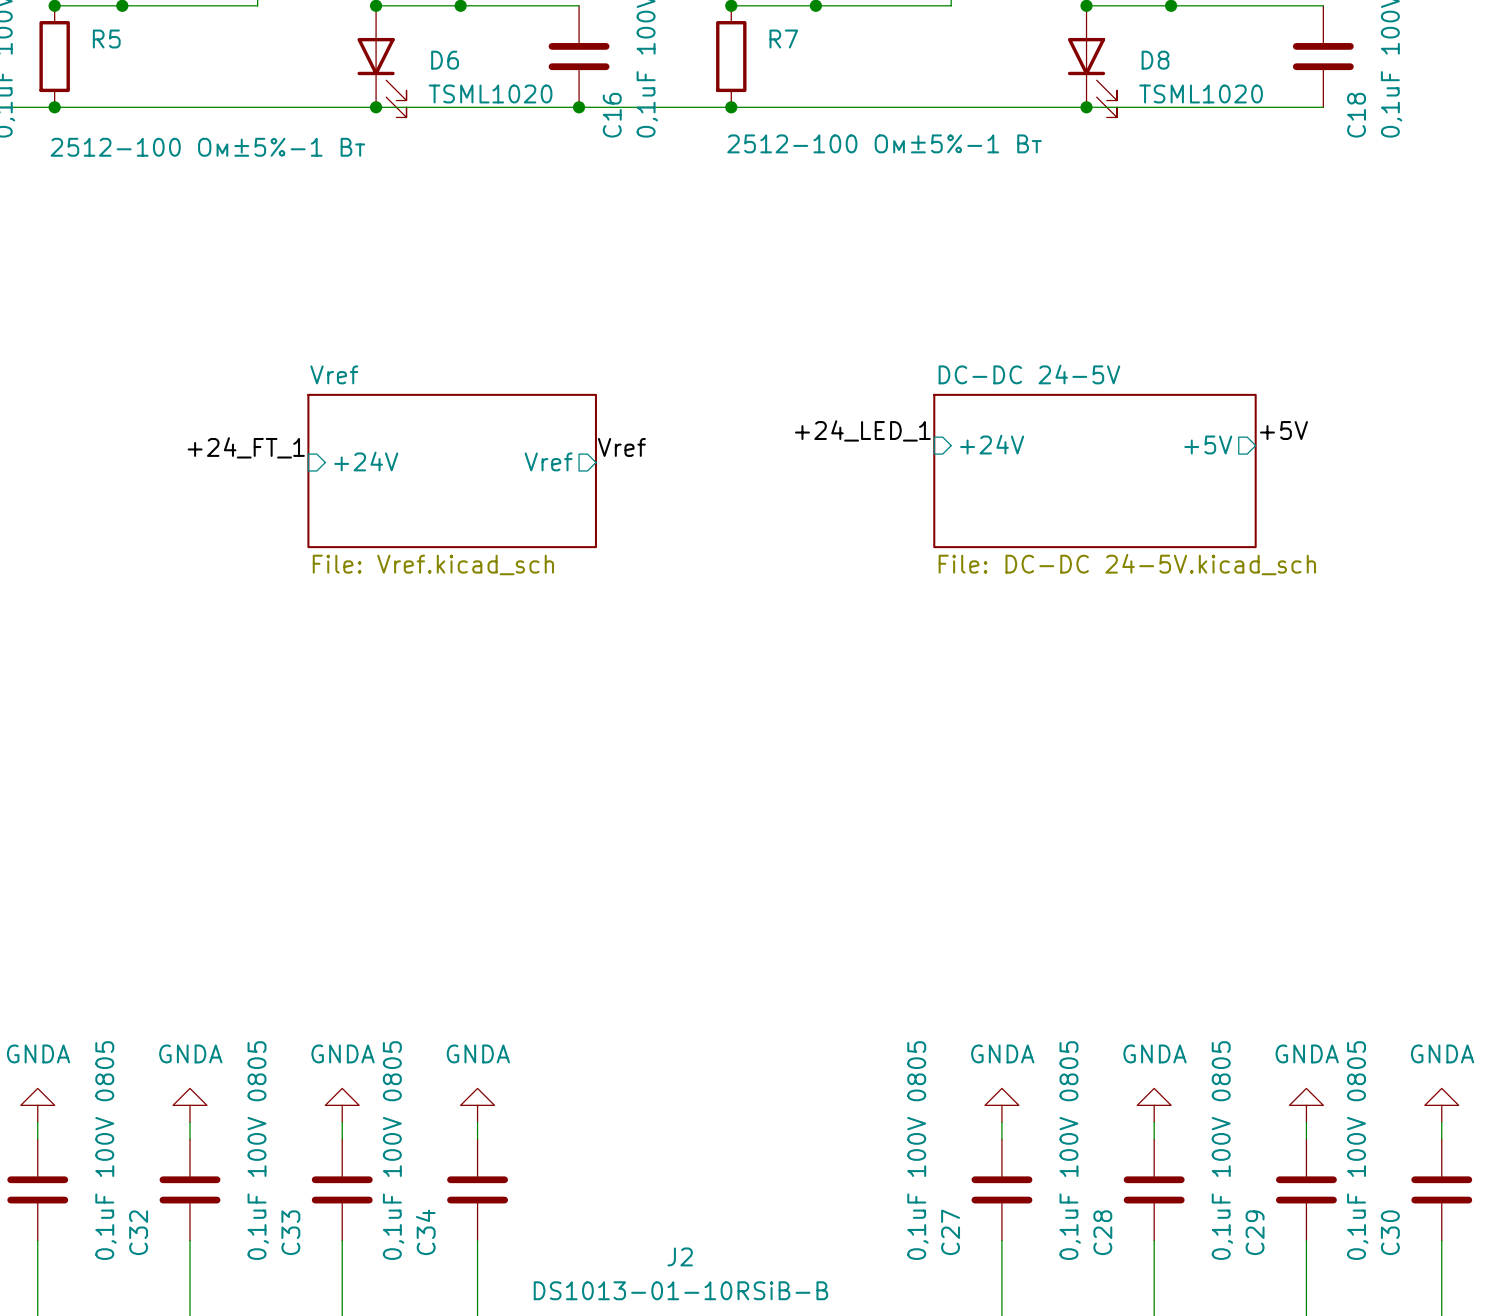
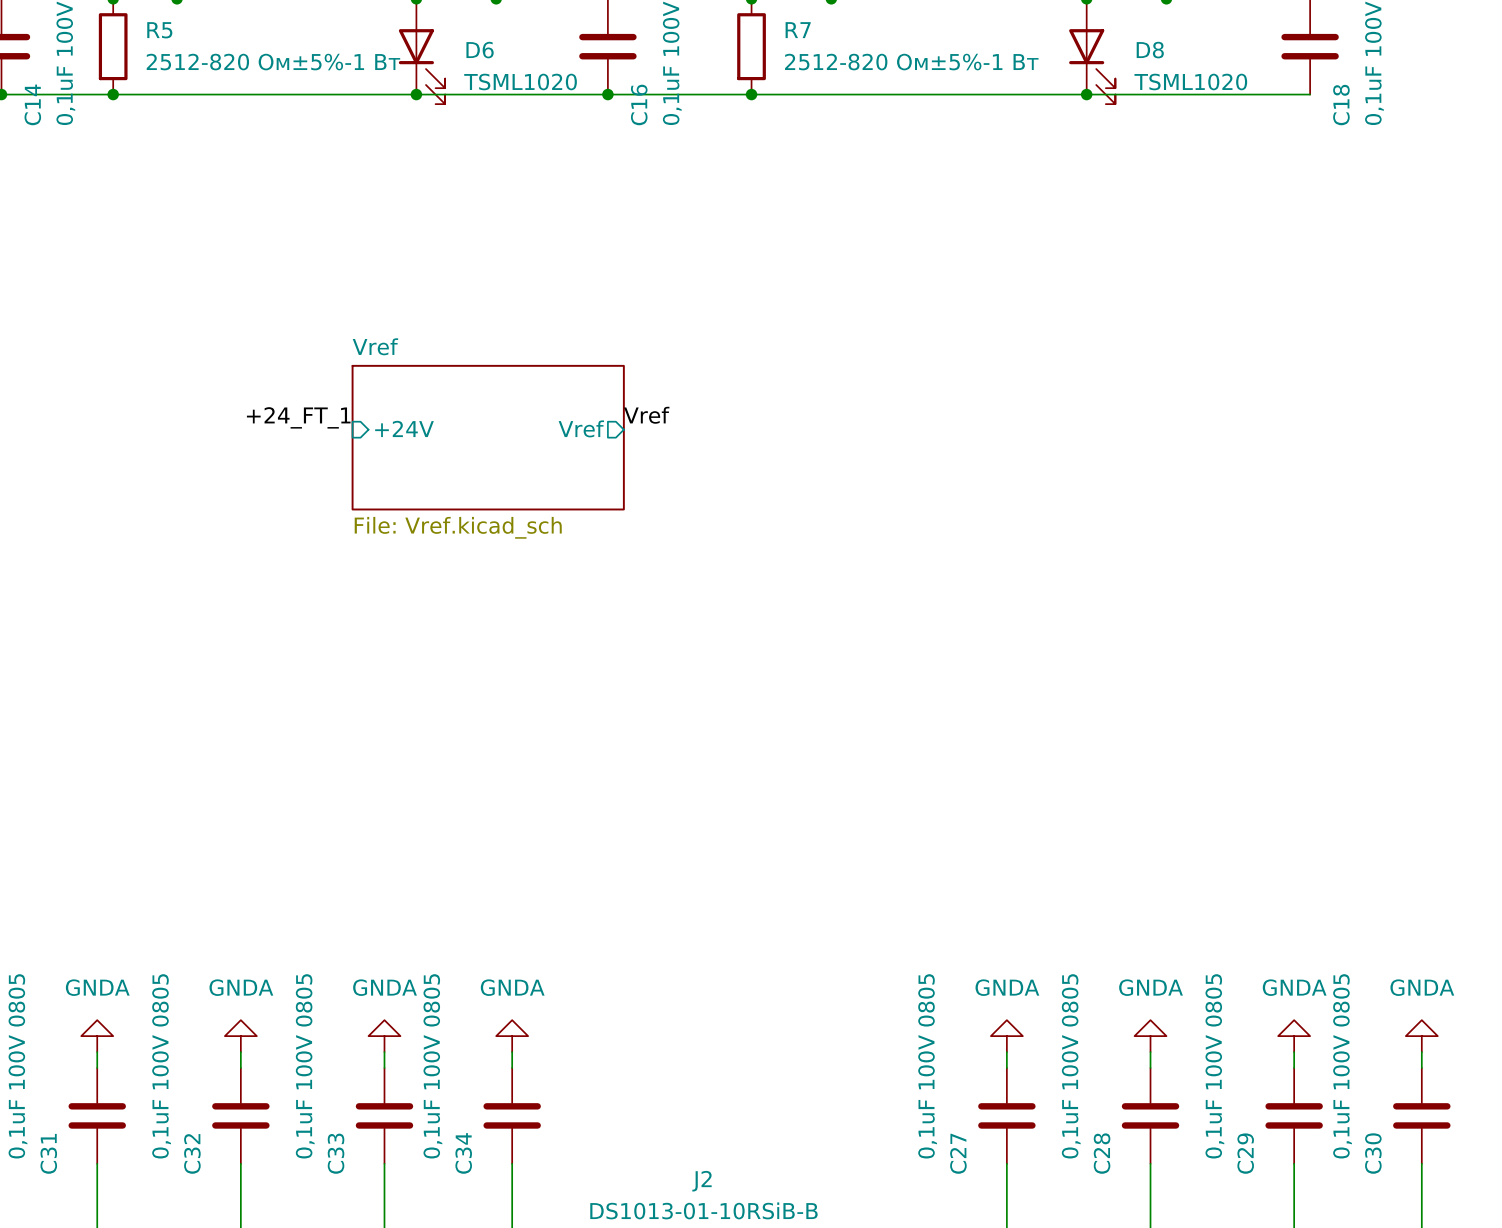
R7 value: 2512-100 Ом±5%-1 Вт (884, 143) -> 2512-820 Ом±5%-1 Вт (911, 62)
R5 value: 2512-100 Ом±5%-1 Вт (207, 147) -> 2512-820 Ом±5%-1 Вт (273, 62)
label: +24_LED_1 (862, 430) -> none
label: +5V (1284, 430) -> none
sheet pin: +24V (992, 444) -> none
sheet pin: +5V (1208, 444) -> none
sheet DC-DC 24-5V: File: DC-DC 24-5V.kicad_sch (1094, 470) -> none

